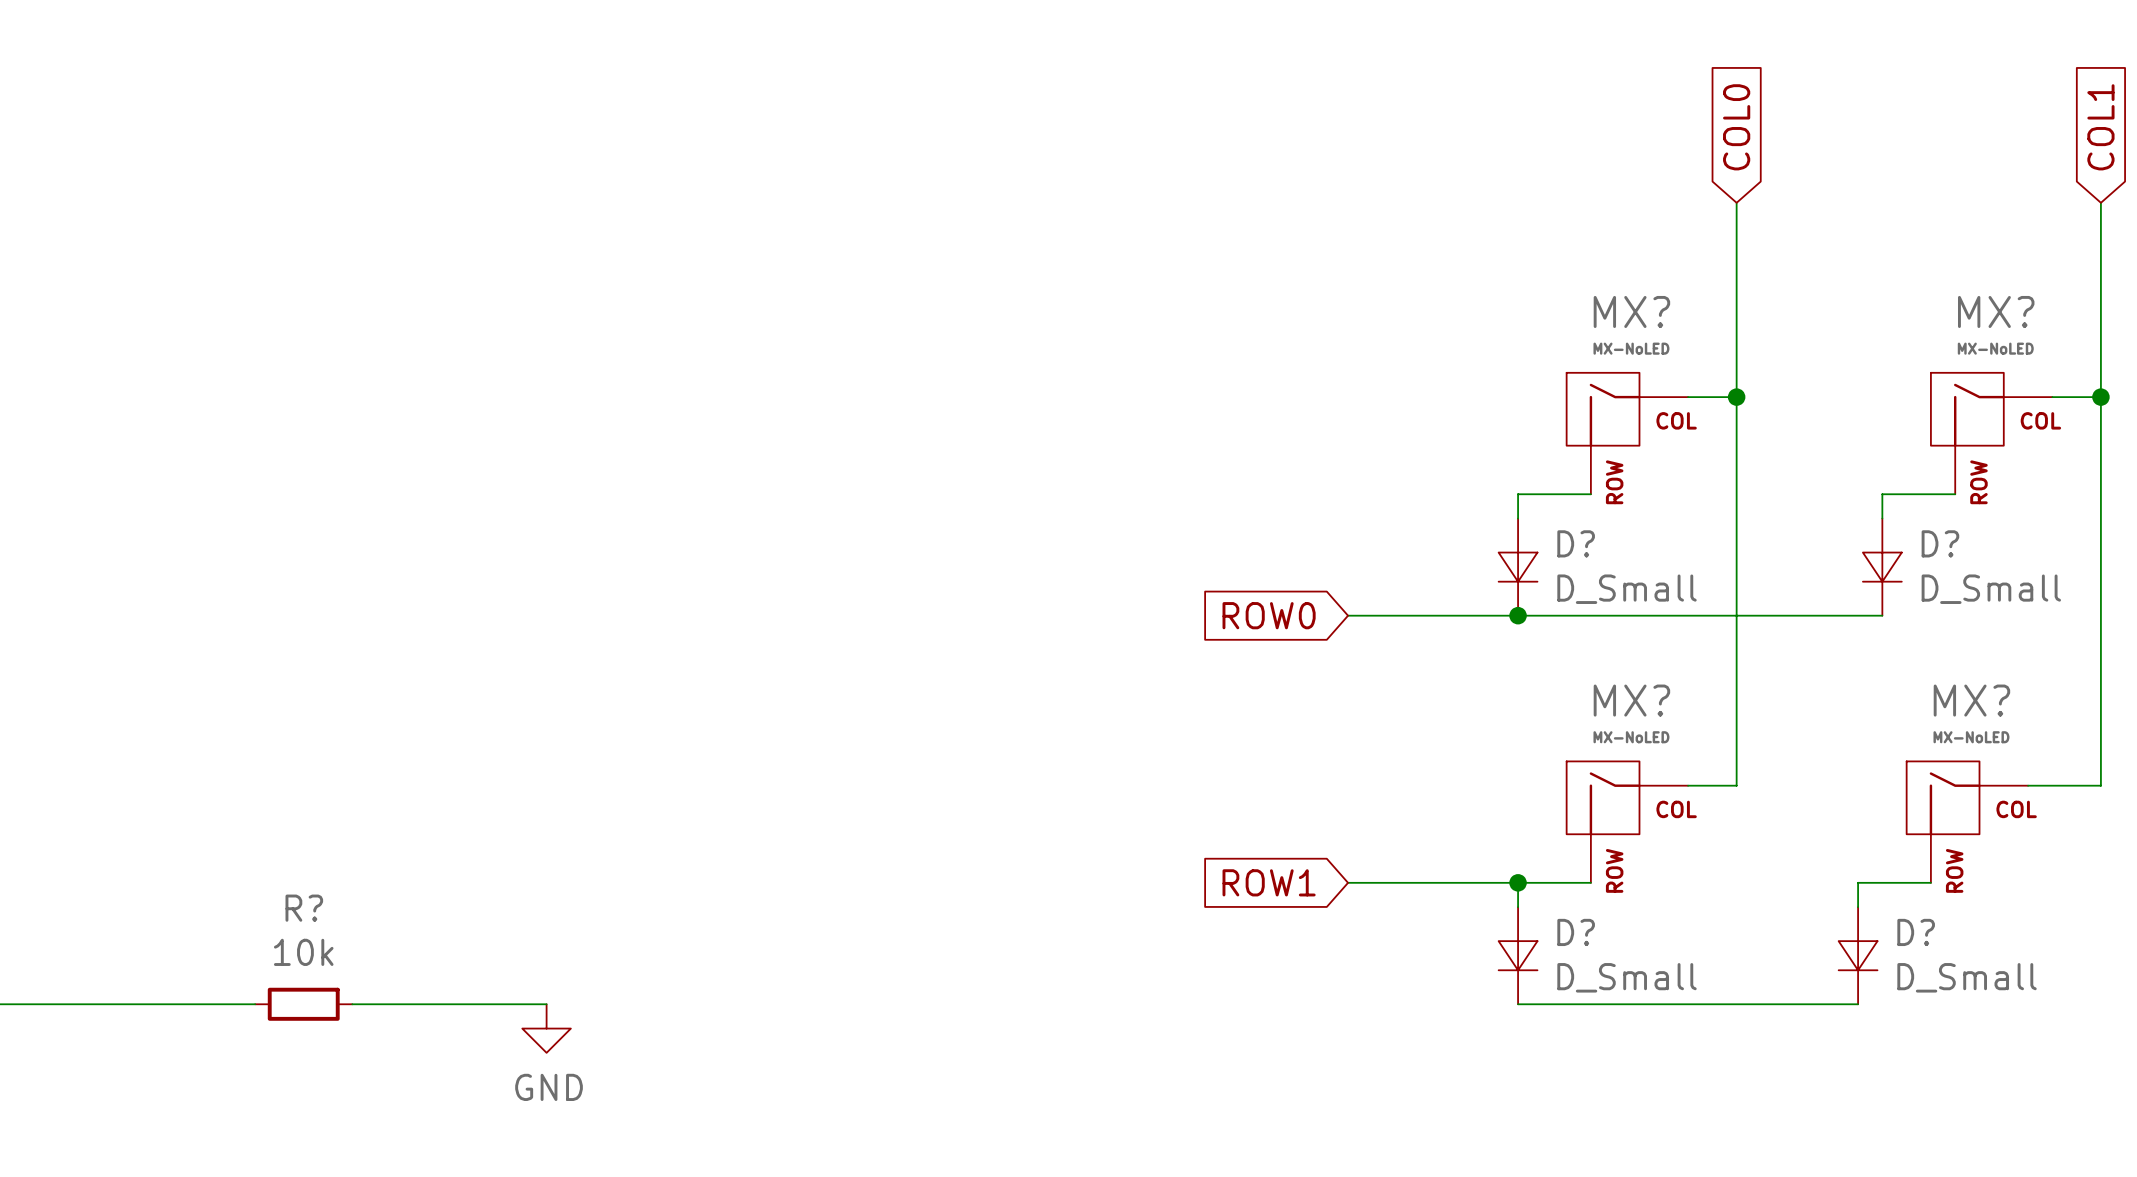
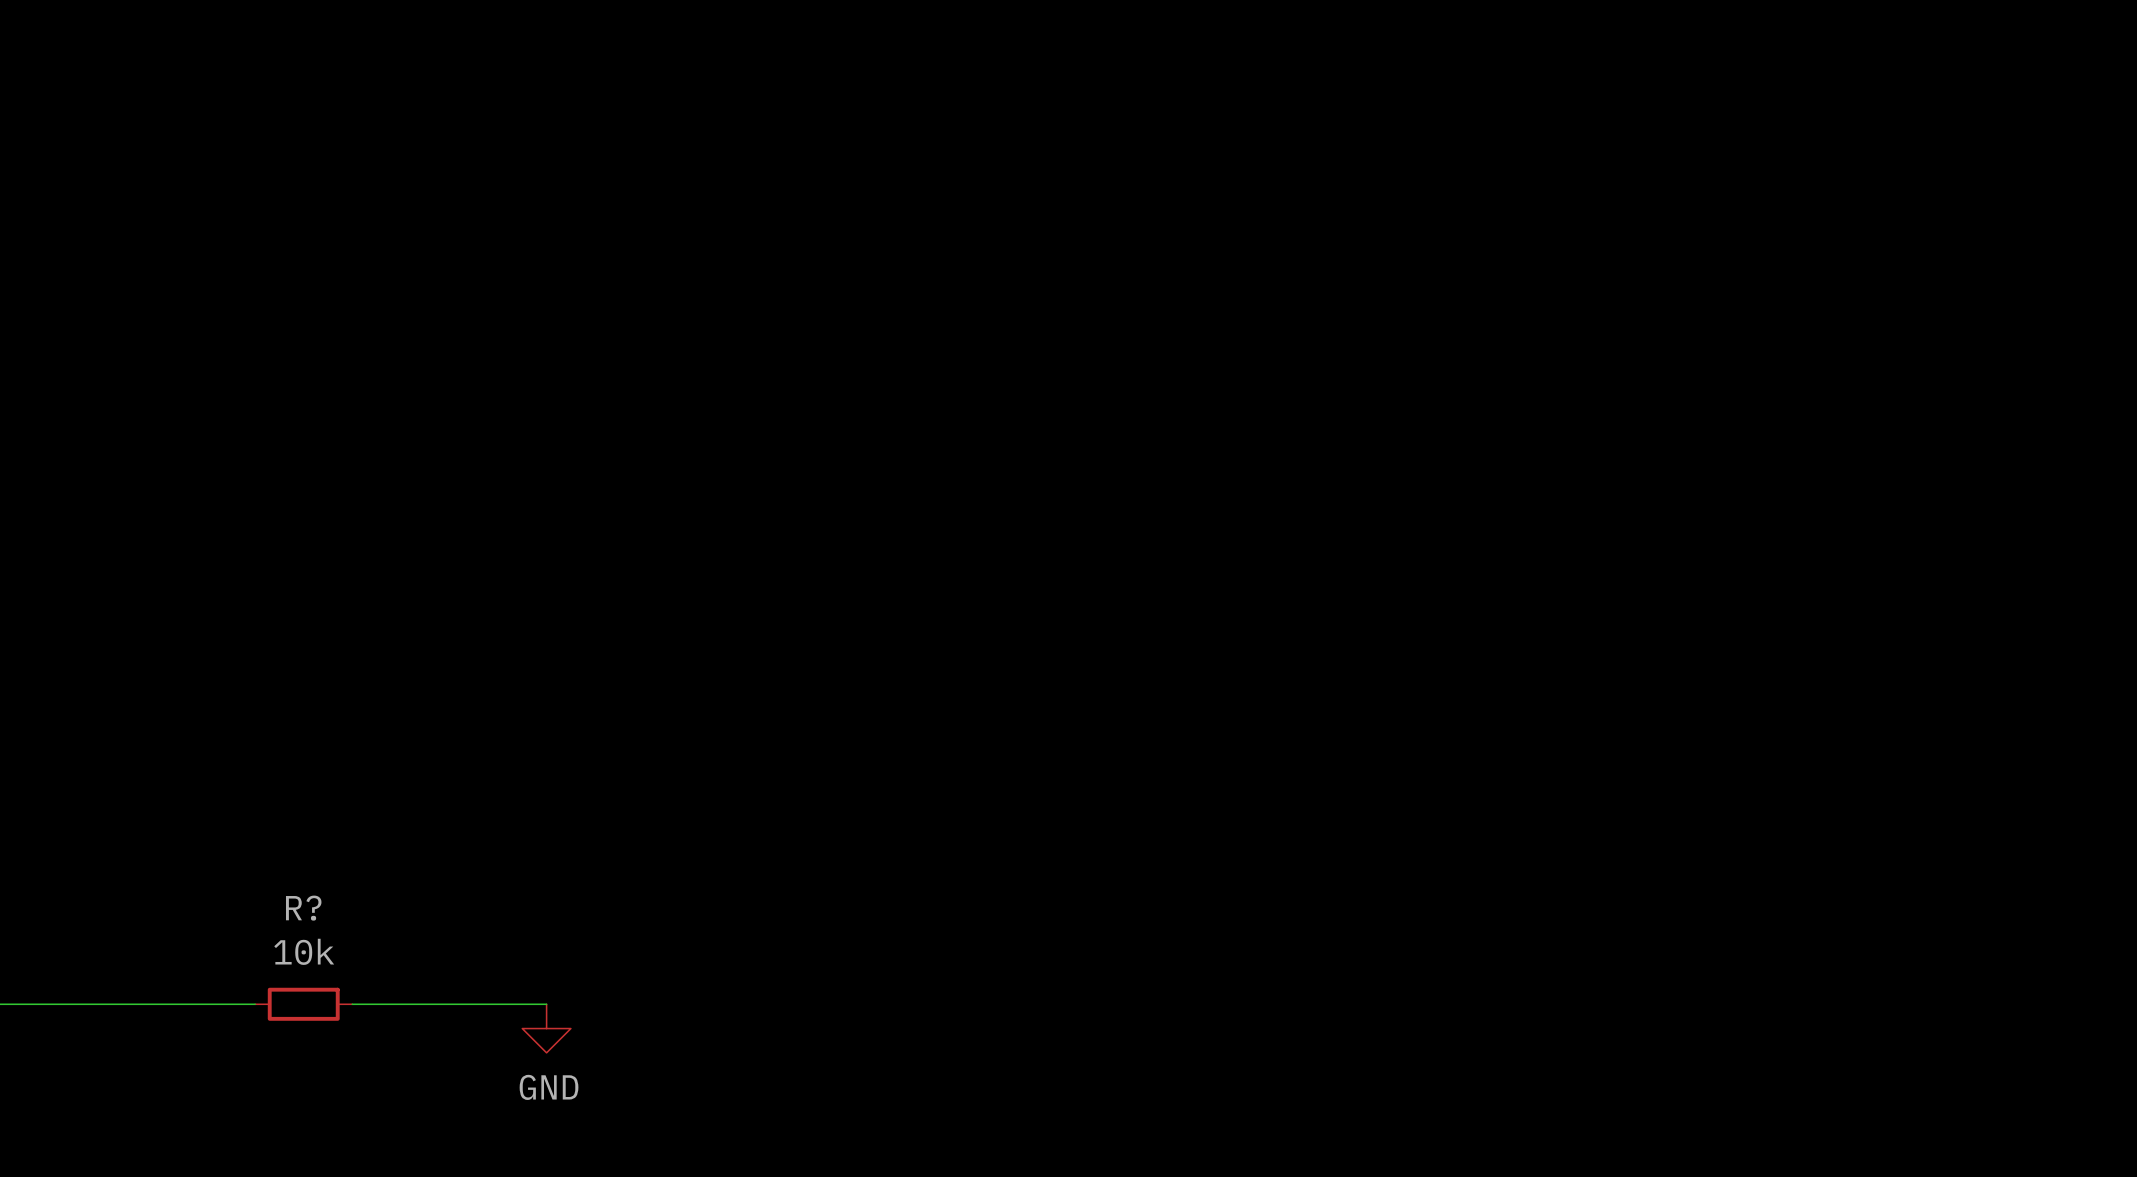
global label: COL0 (1736, 127) -> none
global label: COL1 (2100, 127) -> none
wire: (1736, 202) (1736, 785) (1688, 785) -> none
wire: (2100, 202) (2100, 785) (2028, 785) -> none
wire: (1688, 397) (1736, 397) -> none
junction: (1736, 397) -> none
wire: (2052, 397) (2100, 397) -> none
junction: (2100, 397) -> none
MX?: MX-NoLED (1627, 433) -> none
MX?: MX-NoLED (1991, 433) -> none
wire: (1590, 494) (1518, 494) (1518, 518) -> none
wire: (1955, 494) (1882, 494) (1882, 518) -> none
D?: D_Small (1518, 567) -> none
D?: D_Small (1882, 567) -> none
global label: ROW0 (1269, 615) -> none
wire: (1348, 615) (1882, 615) -> none
junction: (1518, 615) -> none
MX?: MX-NoLED (1627, 822) -> none
MX?: MX-NoLED (1967, 822) -> none
global label: ROW1 (1269, 882) -> none
wire: (1348, 882) (1590, 882) -> none
wire: (1518, 882) (1518, 907) -> none
junction: (1518, 882) -> none
wire: (1930, 882) (1858, 882) (1858, 907) -> none
D?: D_Small (1518, 955) -> none
D?: D_Small (1858, 955) -> none
wire: (1518, 1004) (1858, 1004) -> none

